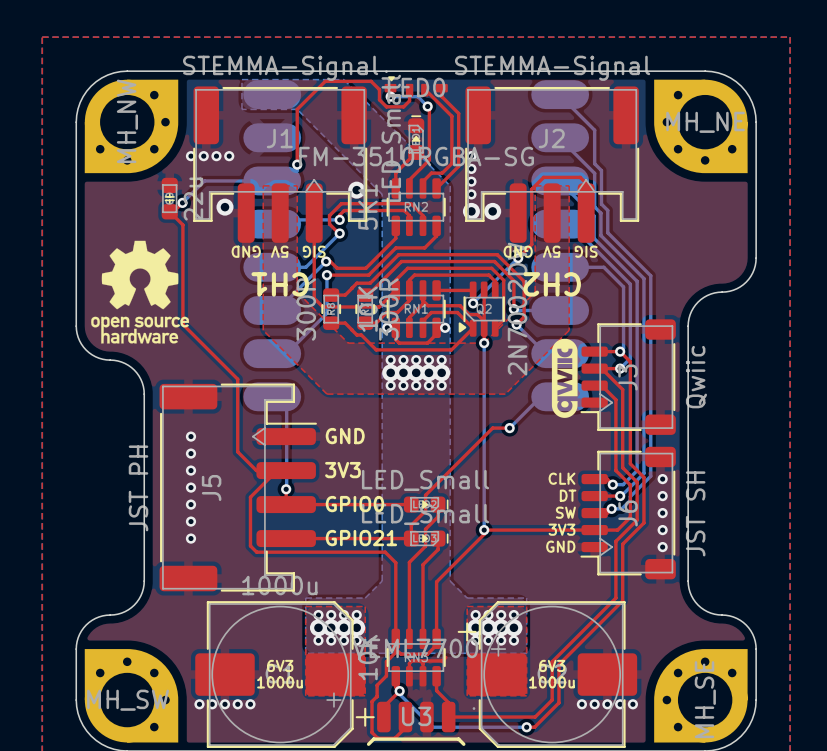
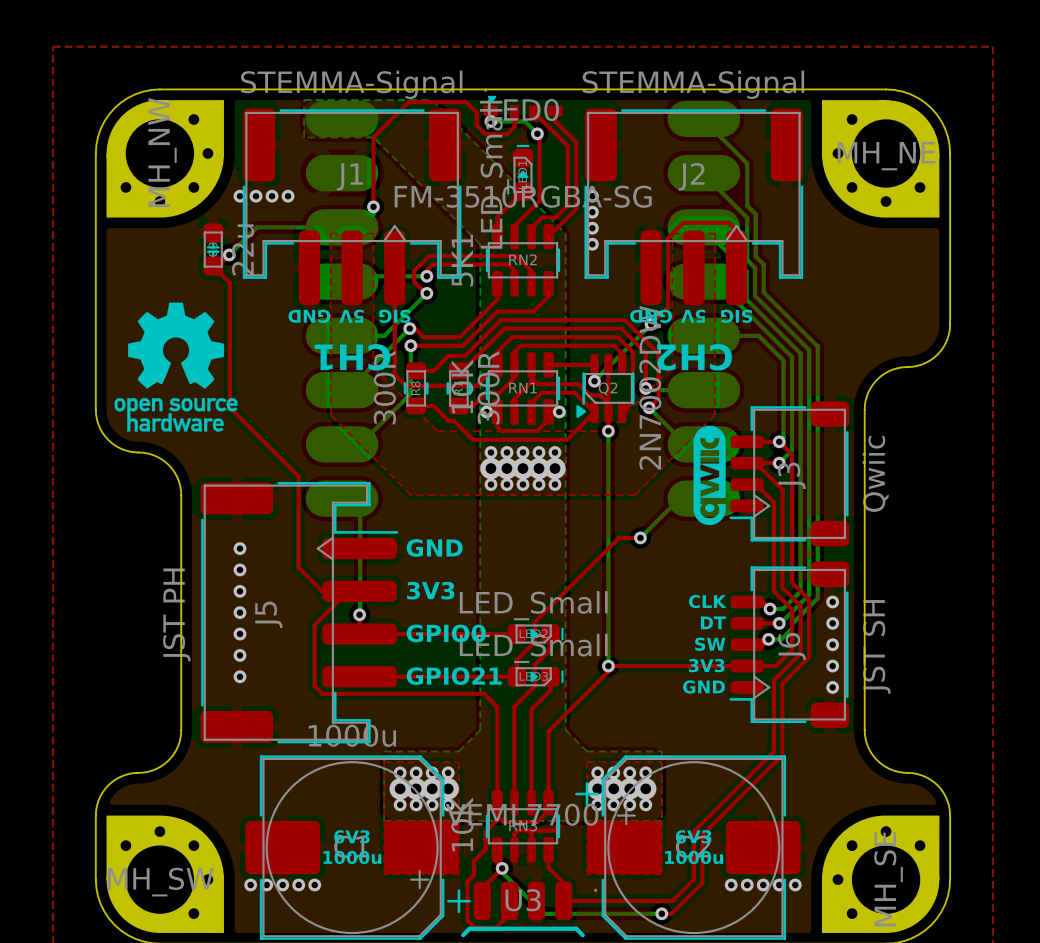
via: (356, 190) -> none
via: (224, 207) -> none
via: (471, 211) -> none
via: (492, 211) -> none

